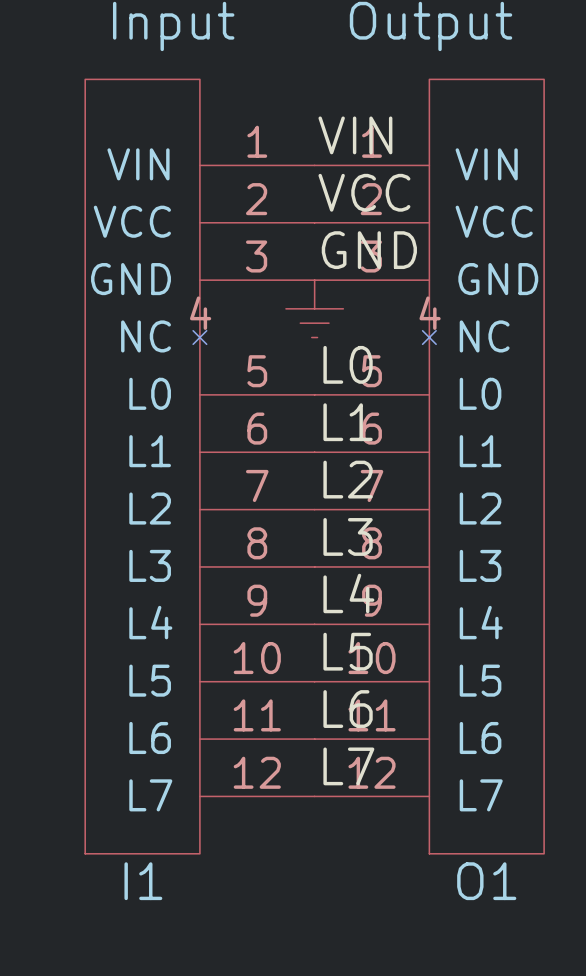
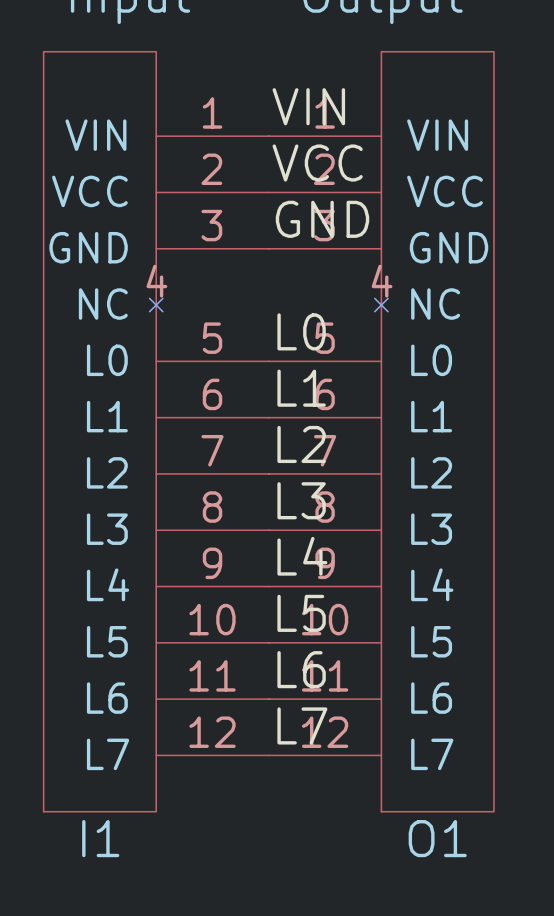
power symbol: (314, 308) -> none

